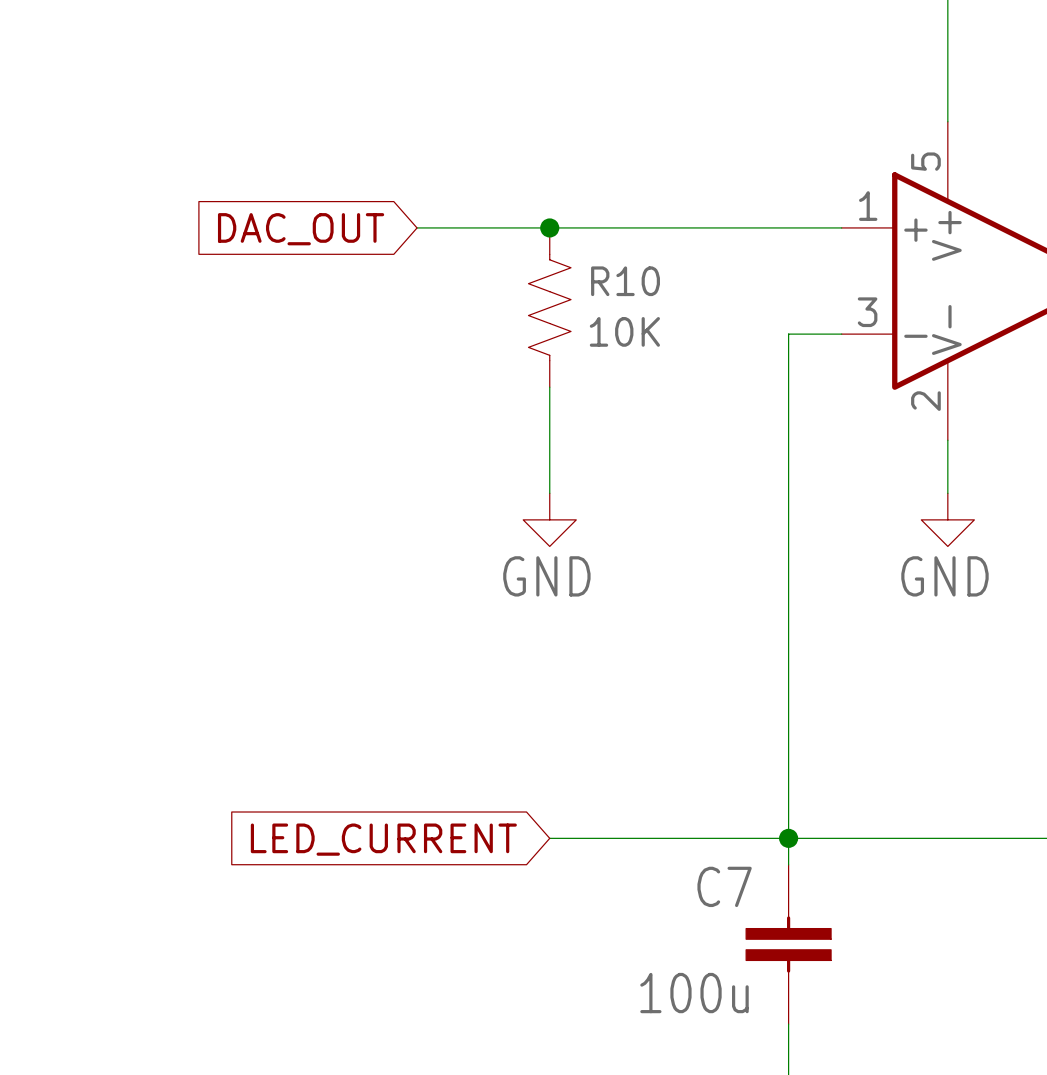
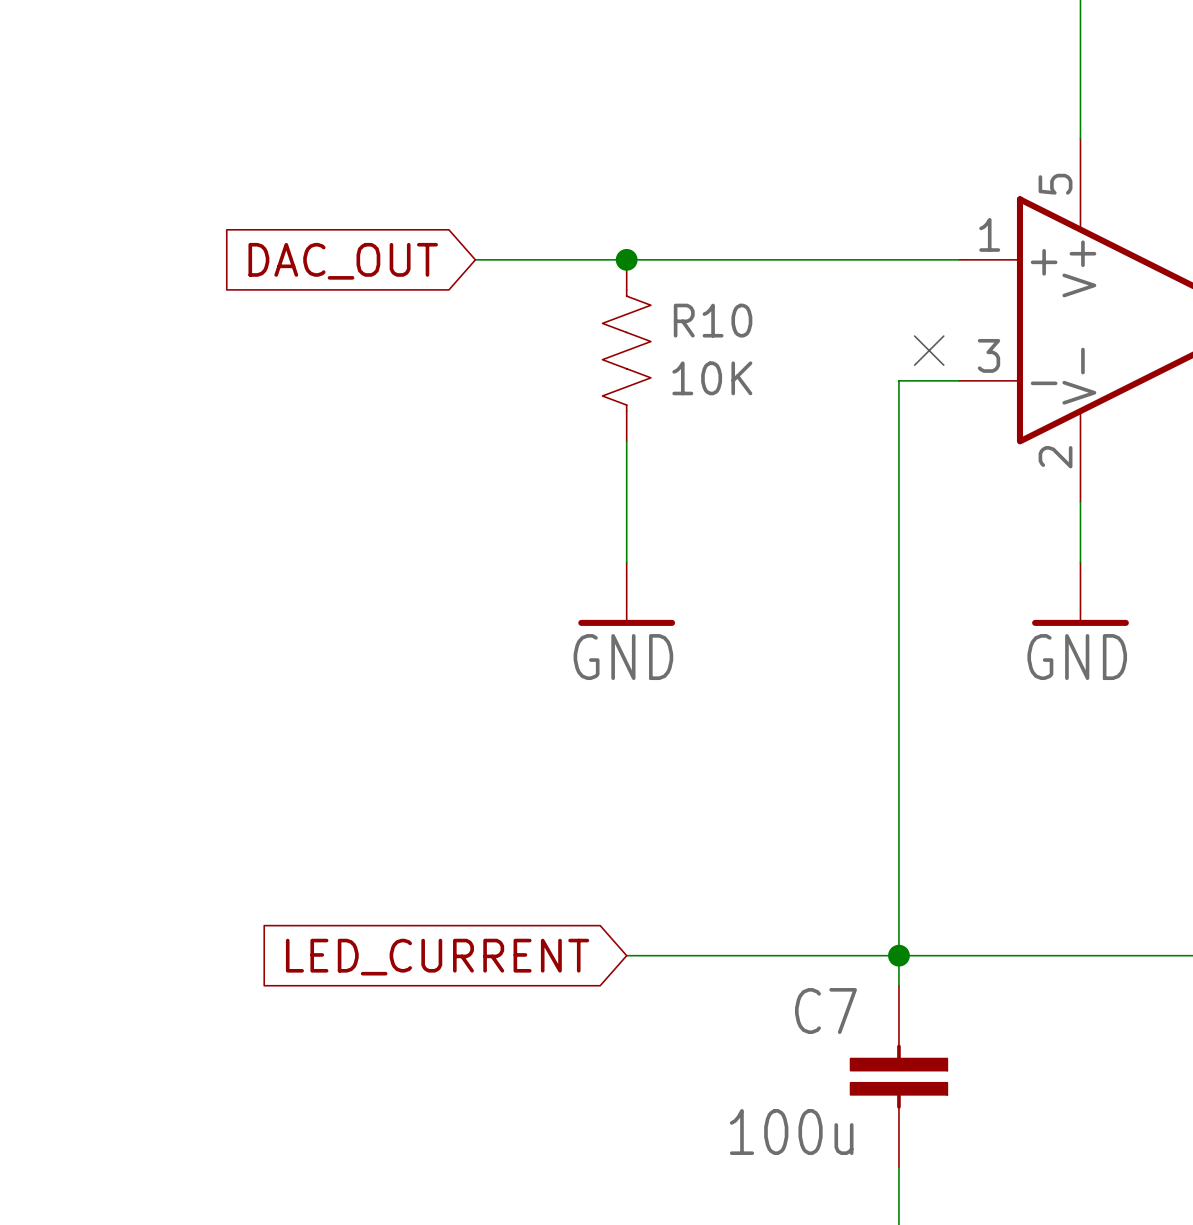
no-connect mark: none -> (929, 350)
power symbol shape: [523, 493, 577, 547] -> [578, 562, 676, 626]
power symbol shape: [921, 493, 975, 547] -> [1032, 562, 1129, 626]

